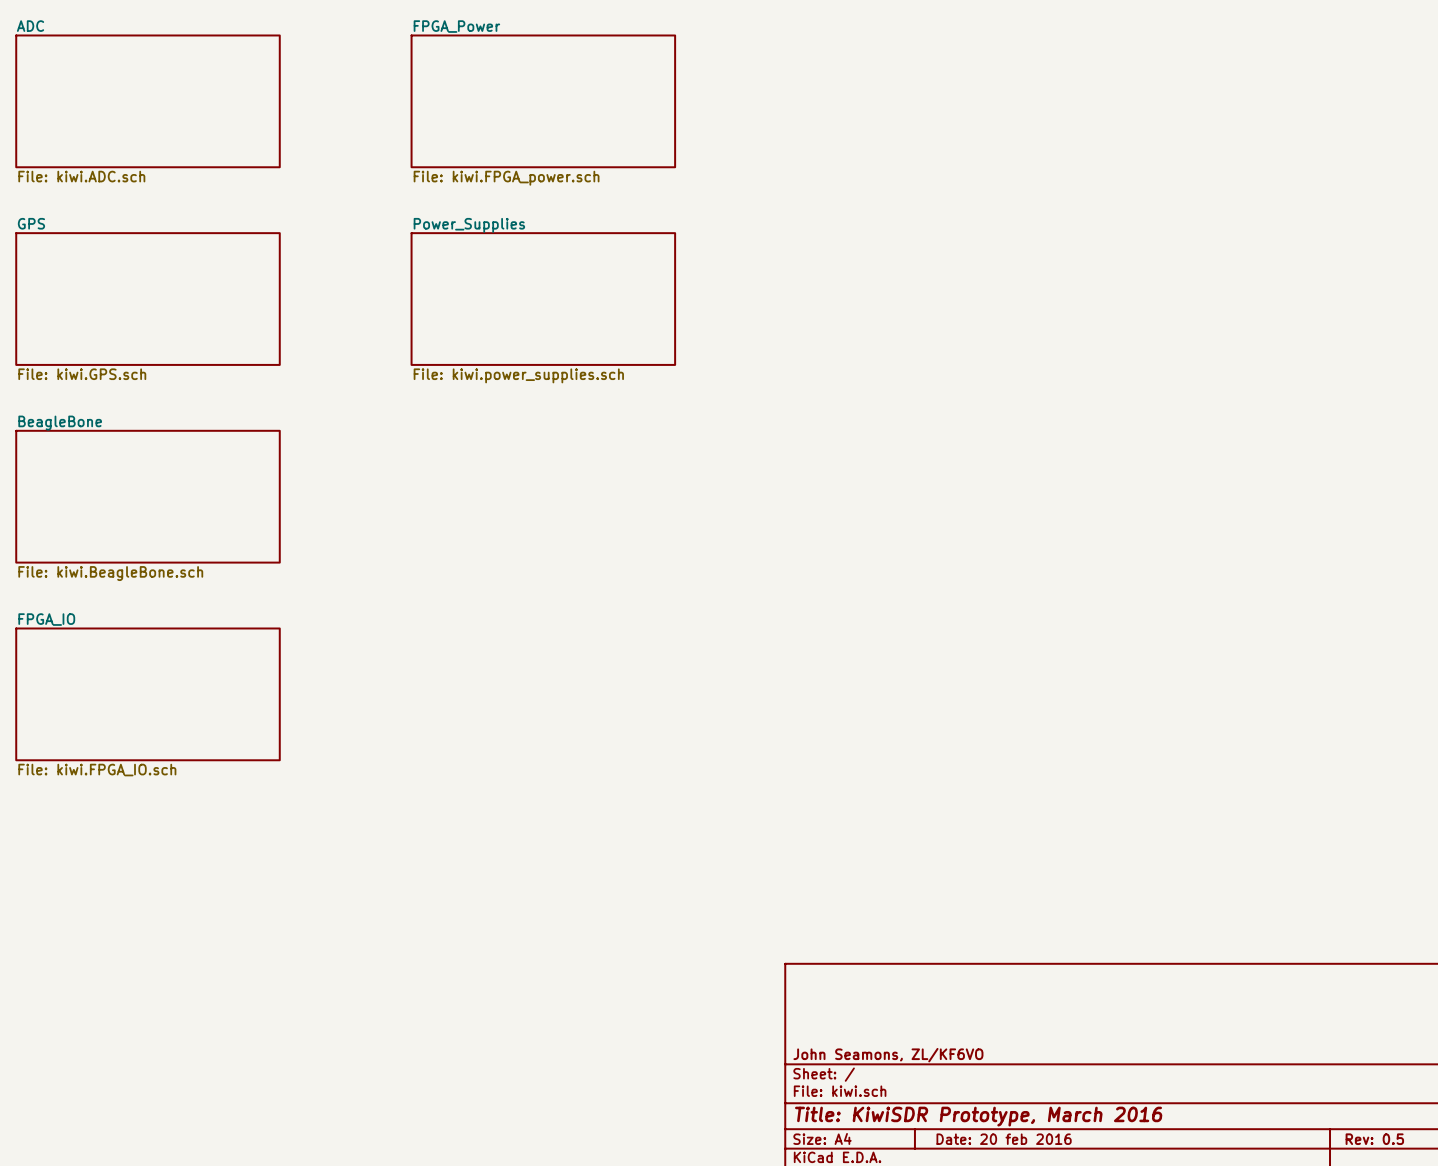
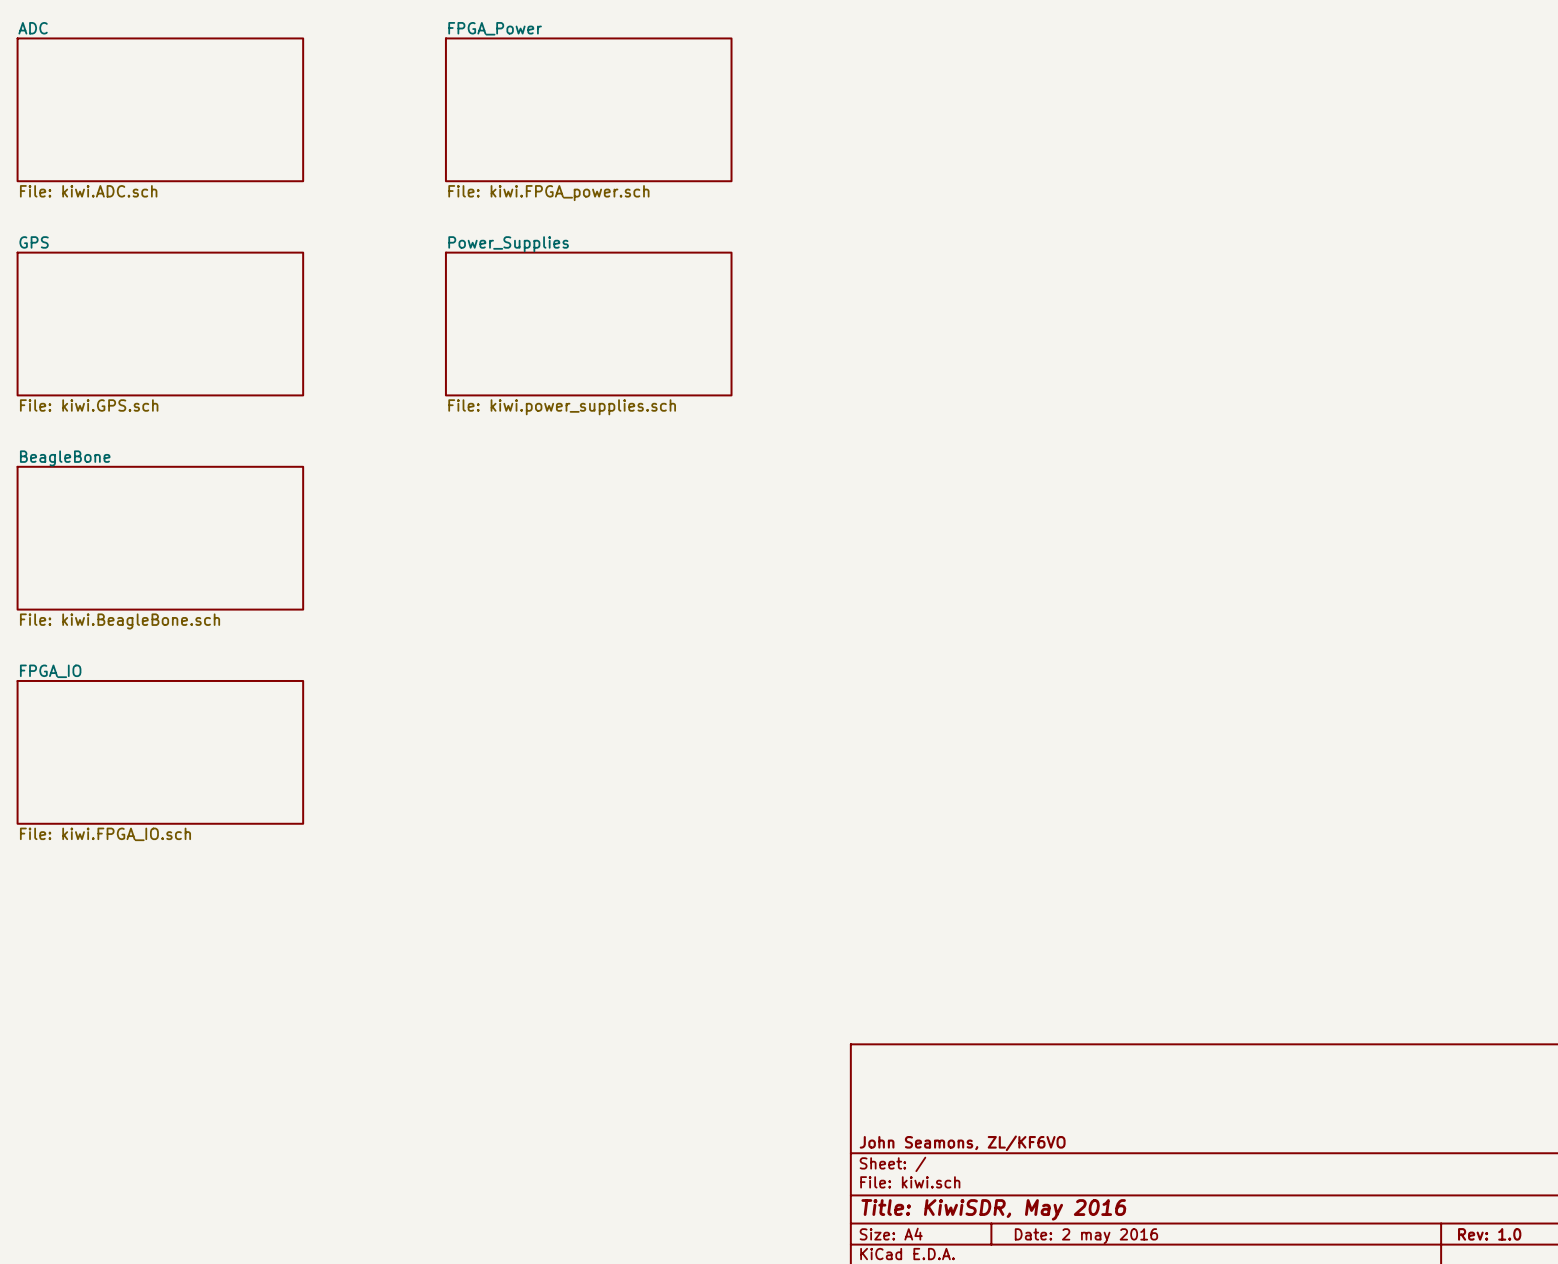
title block: Title: KiwiSDR Prototype, March 2016 (978, 1116) -> Title: KiwiSDR, May 2016 (993, 1209)
title block: Date: 20 feb 2016 (1004, 1139) -> Date: 2 may 2016 (1086, 1236)
title block: Rev: 0.5 (1374, 1139) -> Rev: 1.0 (1489, 1234)

